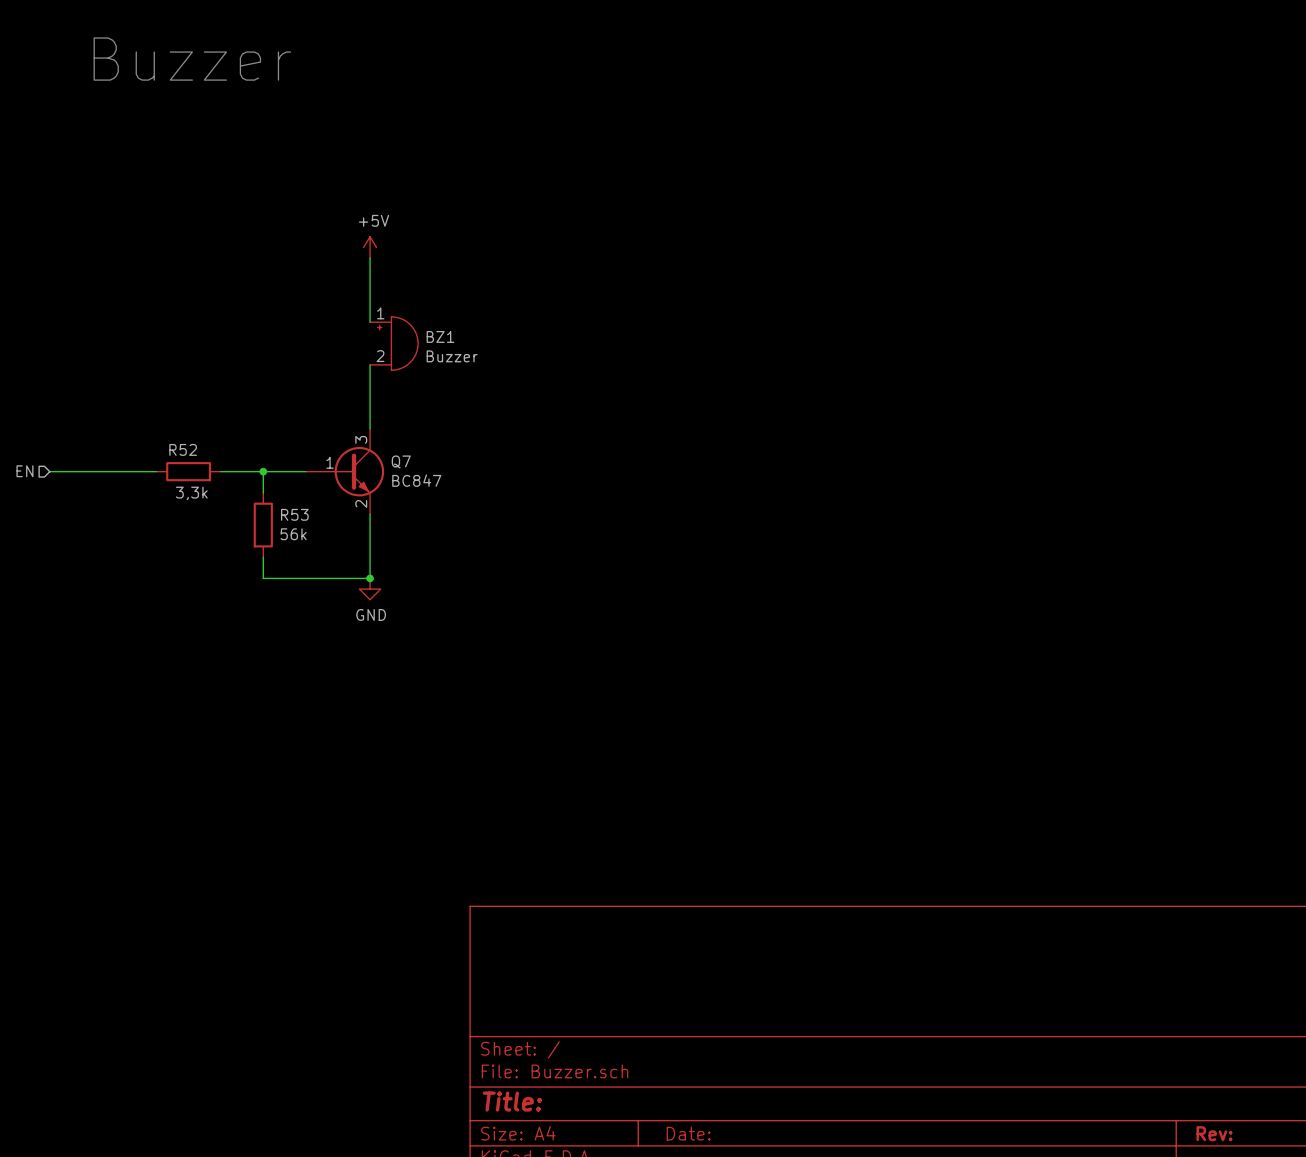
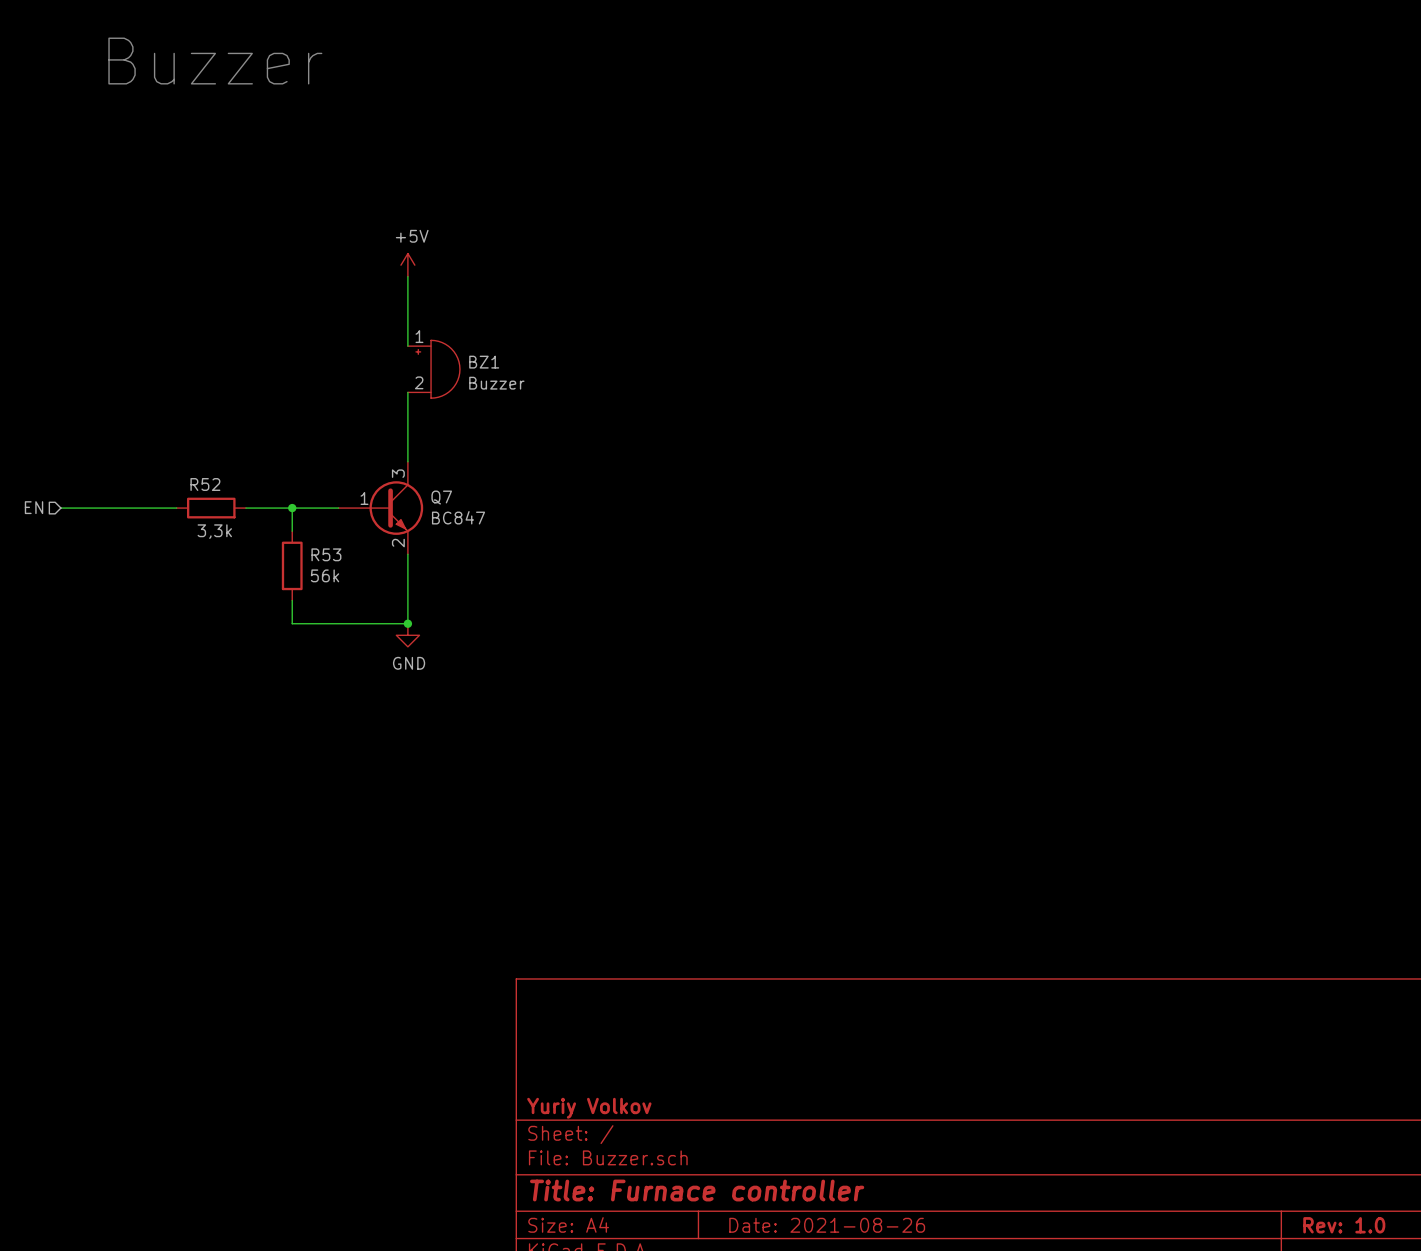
title block: none -> Yuriy Volkov (589, 1108)
title block: Title: (512, 1101) -> Title: Furnace controller (697, 1190)
title block: Date: (688, 1133) -> Date: 2021-08-26 (827, 1225)
title block: Rev: (1214, 1133) -> Rev: 1.0 (1344, 1225)

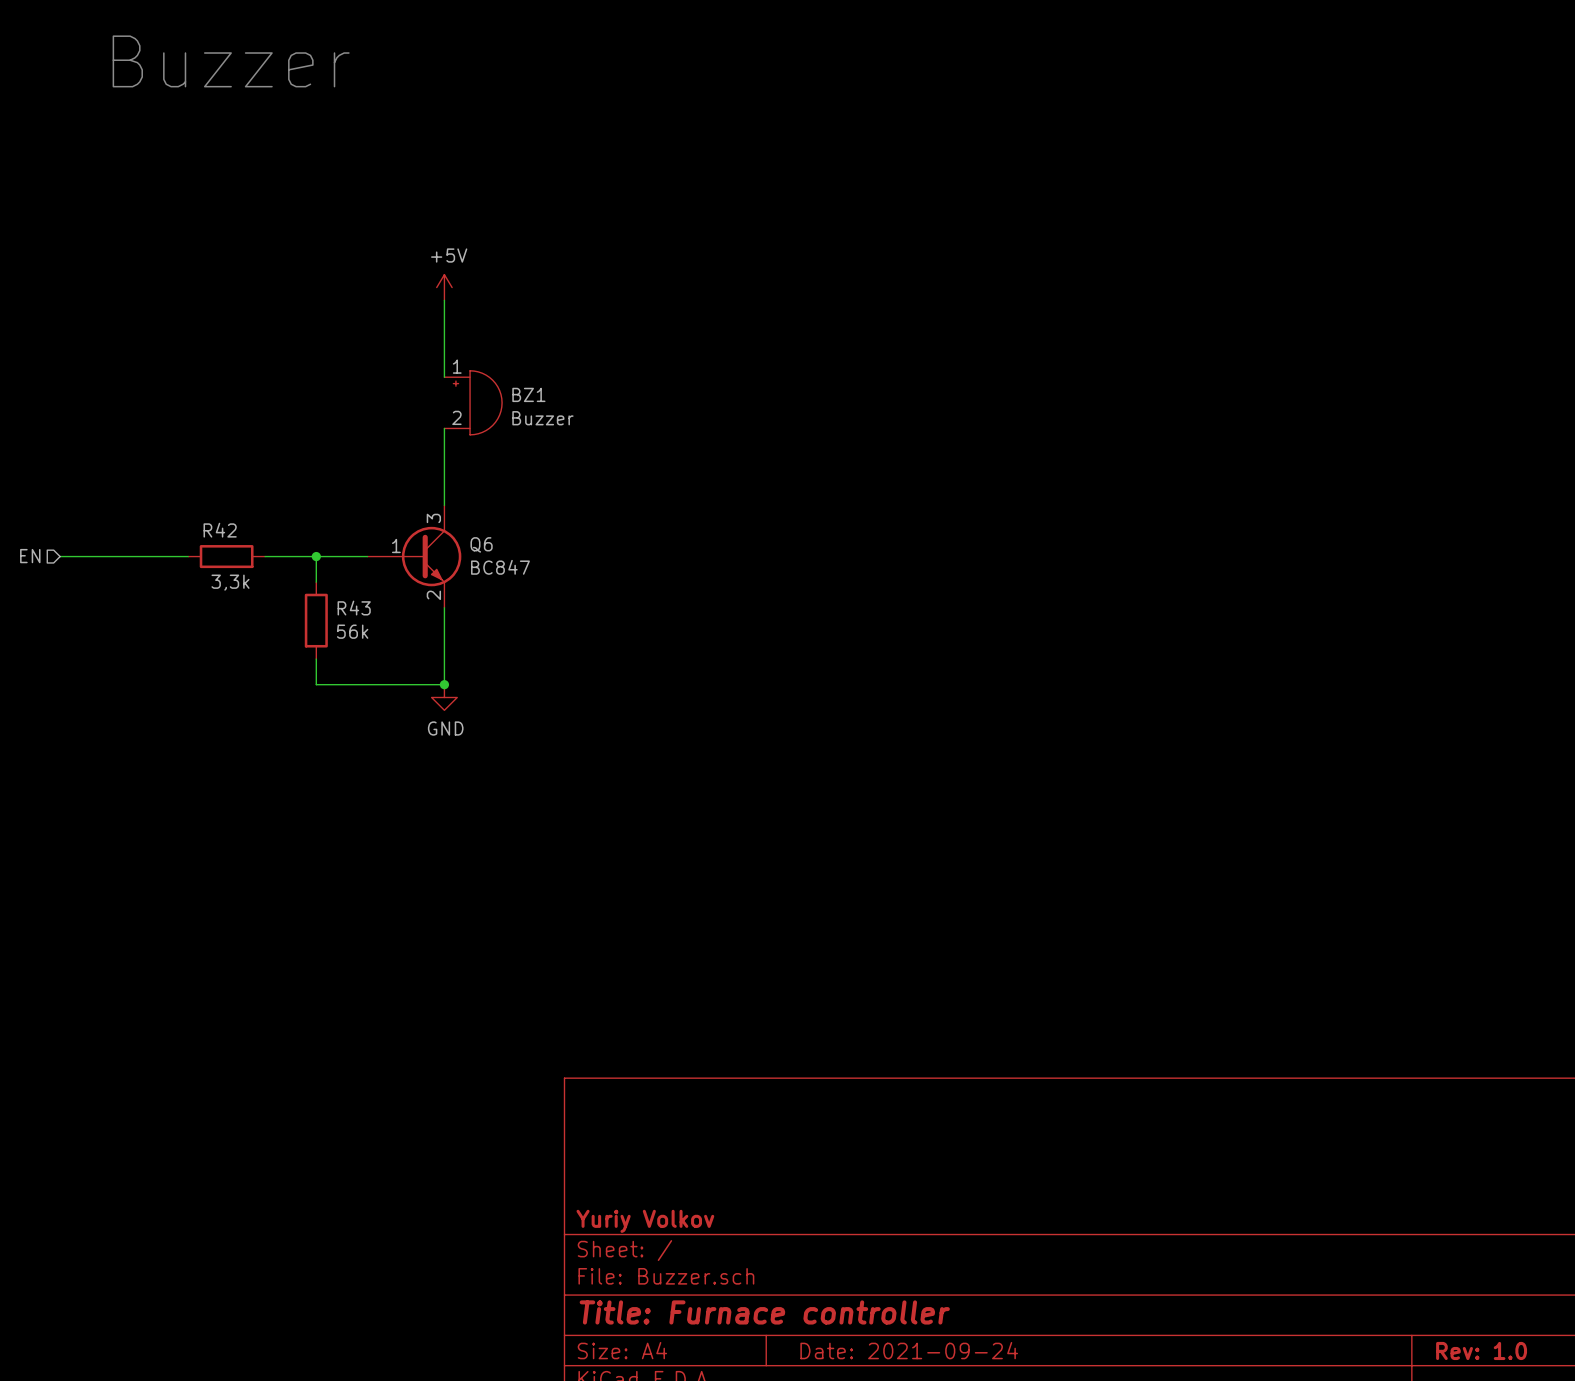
R52 name: R52 (205, 484) -> R42 (220, 530)
Q7 name: Q7 (441, 497) -> Q6 (481, 544)
R53 name: R53 (326, 554) -> R43 (354, 608)
title block: Date: 2021-08-26 (827, 1225) -> Date: 2021-09-24 (909, 1350)

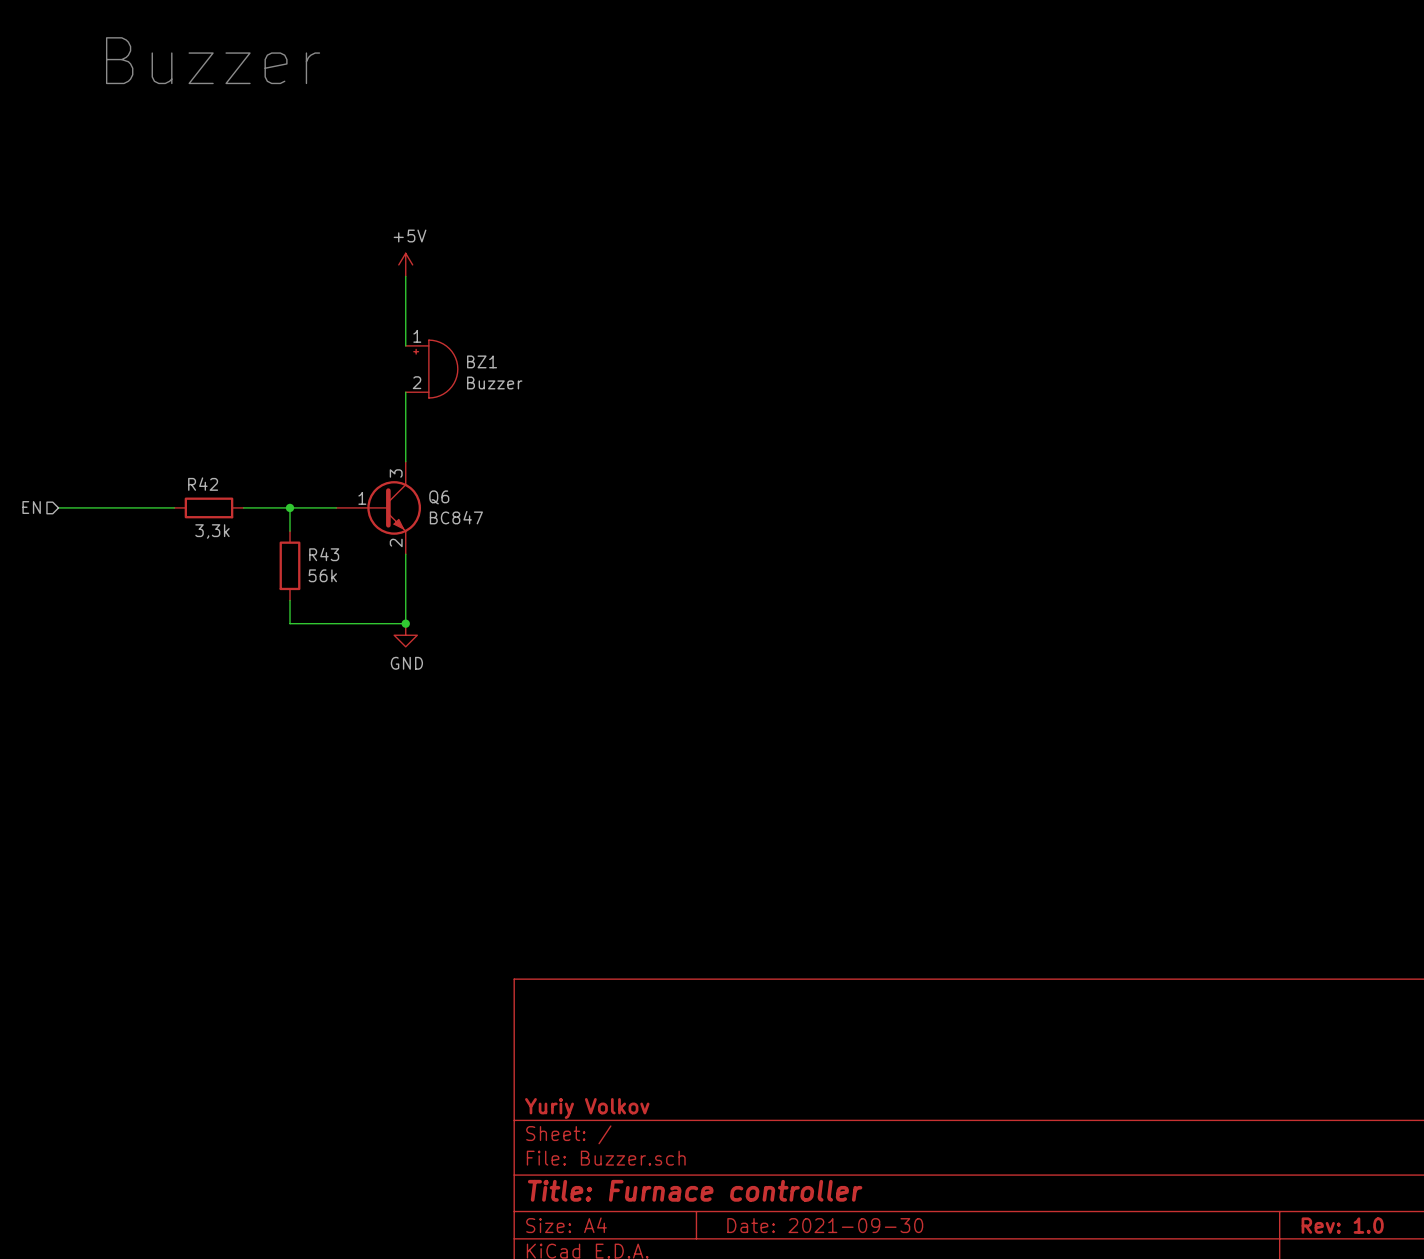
title block: Date: 2021-09-24 (909, 1350) -> Date: 2021-09-30 (825, 1225)

